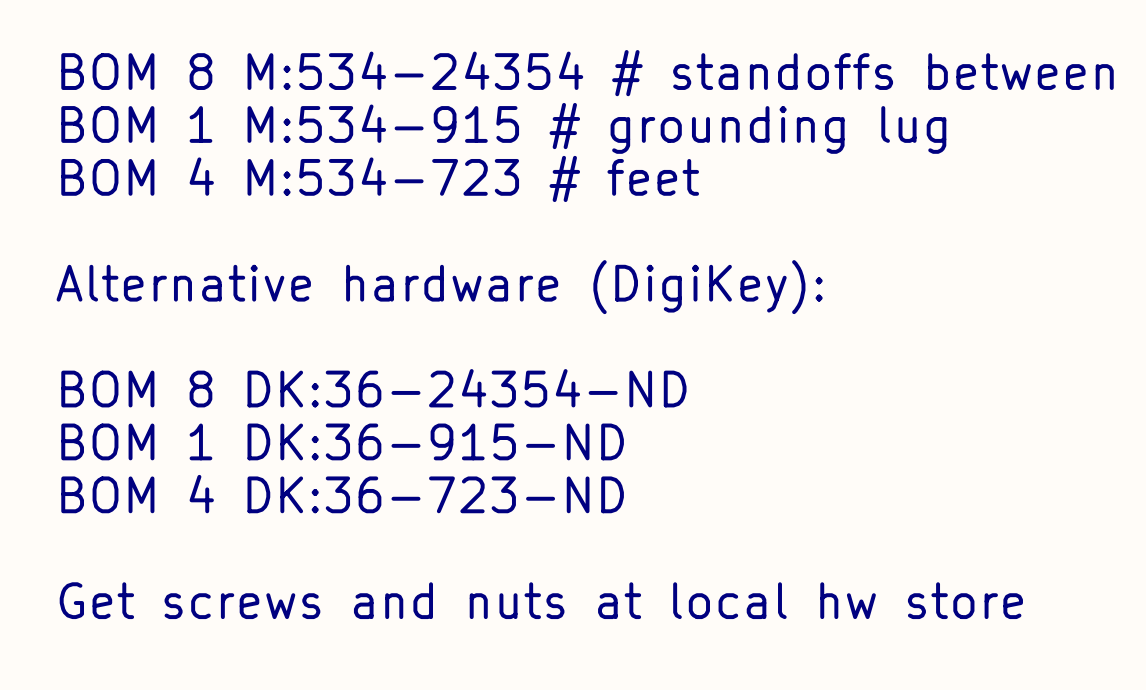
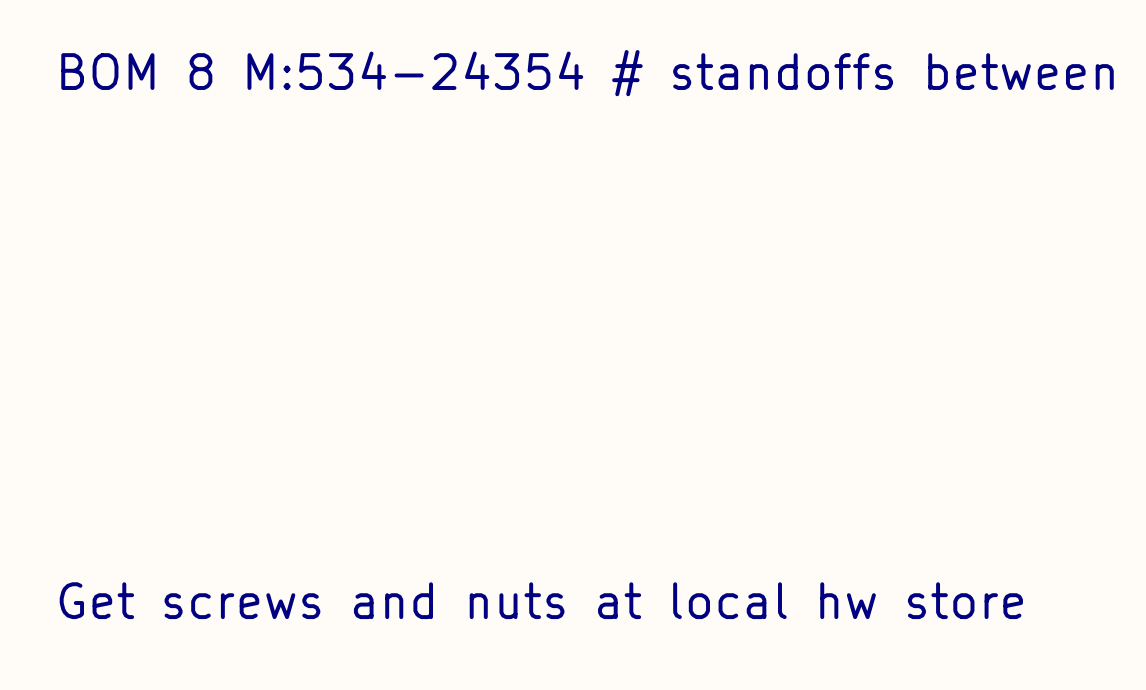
text: BOM 1 M:534-915 # grounding lug (503, 128) -> none
text: BOM 4 M:534-723 # feet (380, 178) -> none
text: Alternative hardware (DigiKey): (439, 287) -> none
text: BOM 8 DK:36-24354-ND (373, 388) -> none
text: BOM 1 DK:36-915-ND (342, 441) -> none
text: BOM 4 DK:36-723-ND (342, 494) -> none

